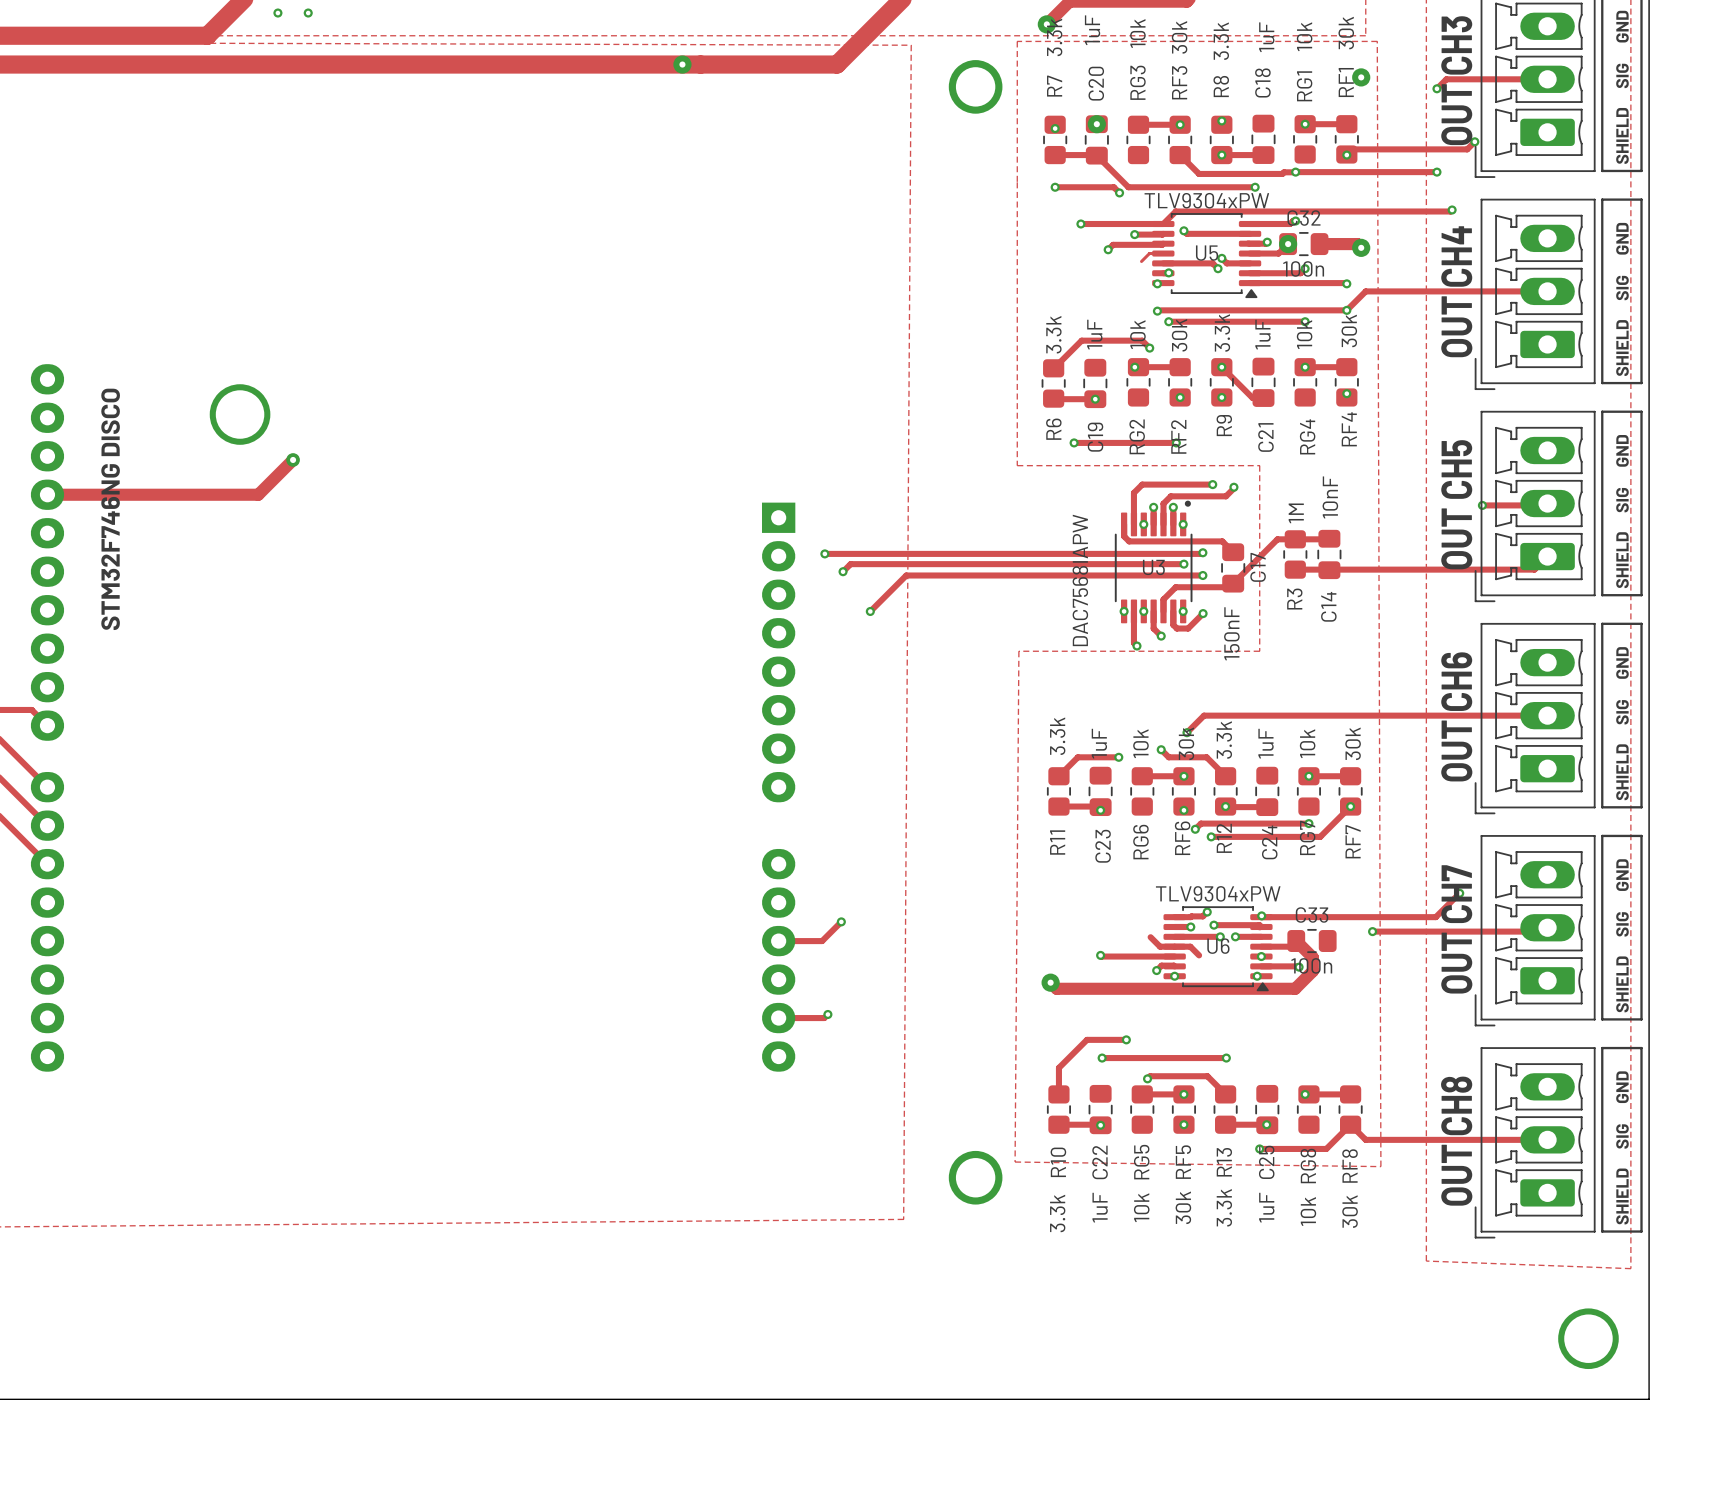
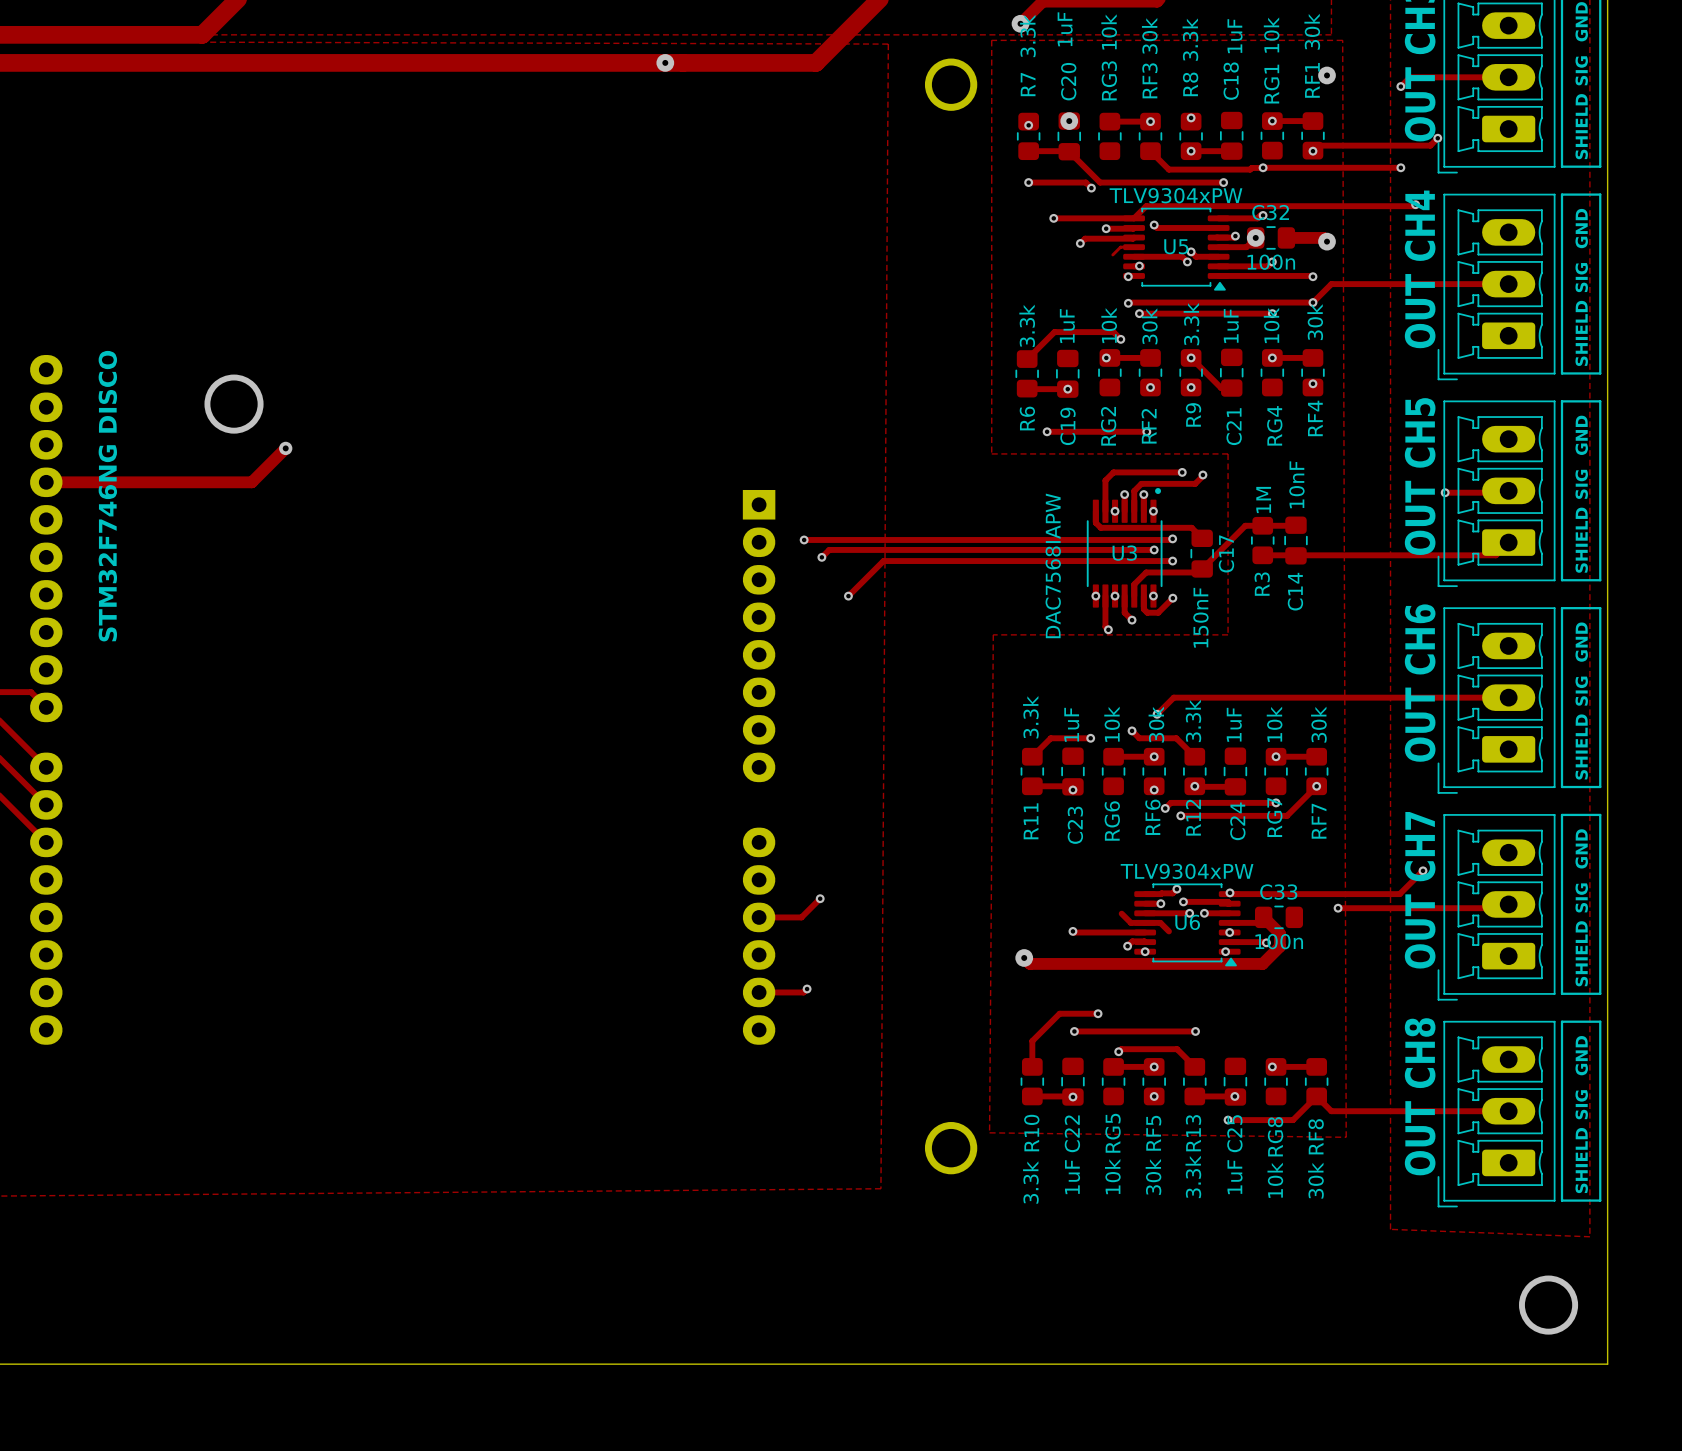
via: (277, 13) -> none
via: (308, 13) -> none

